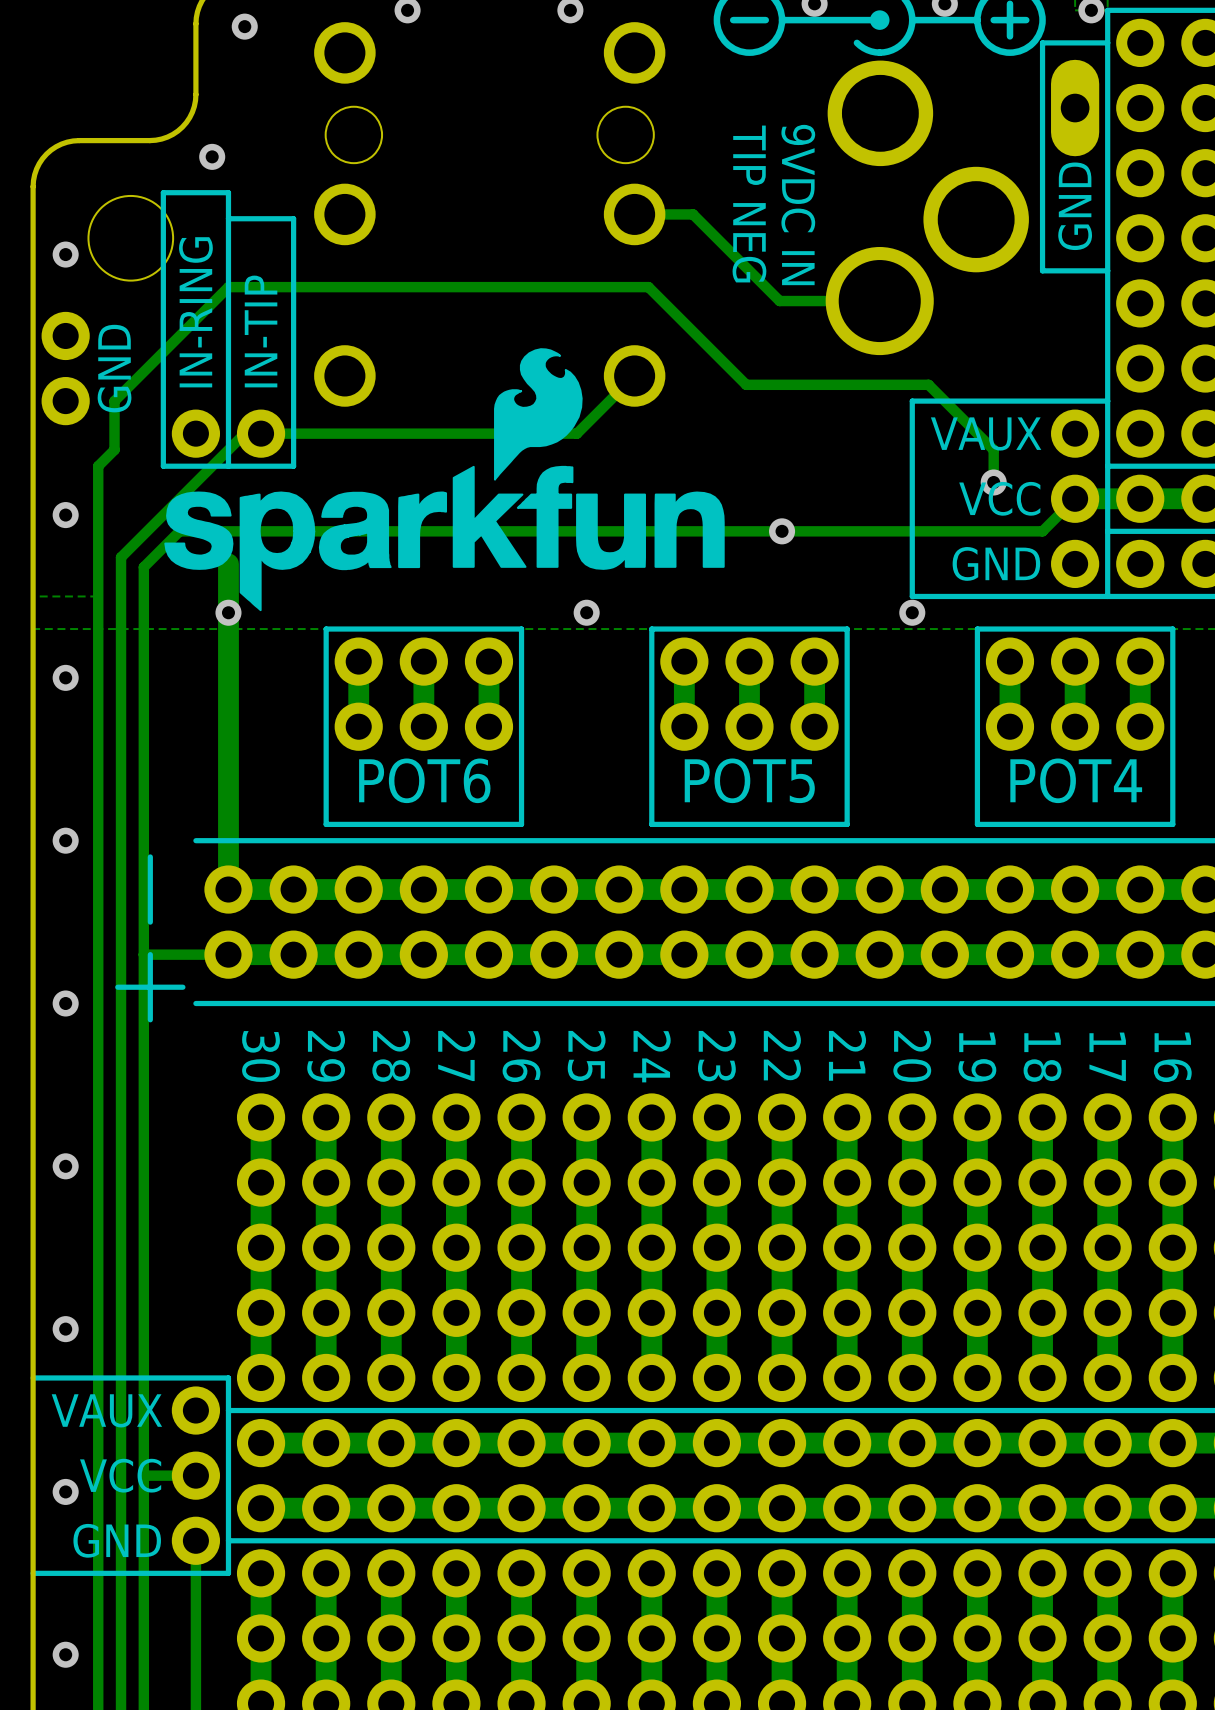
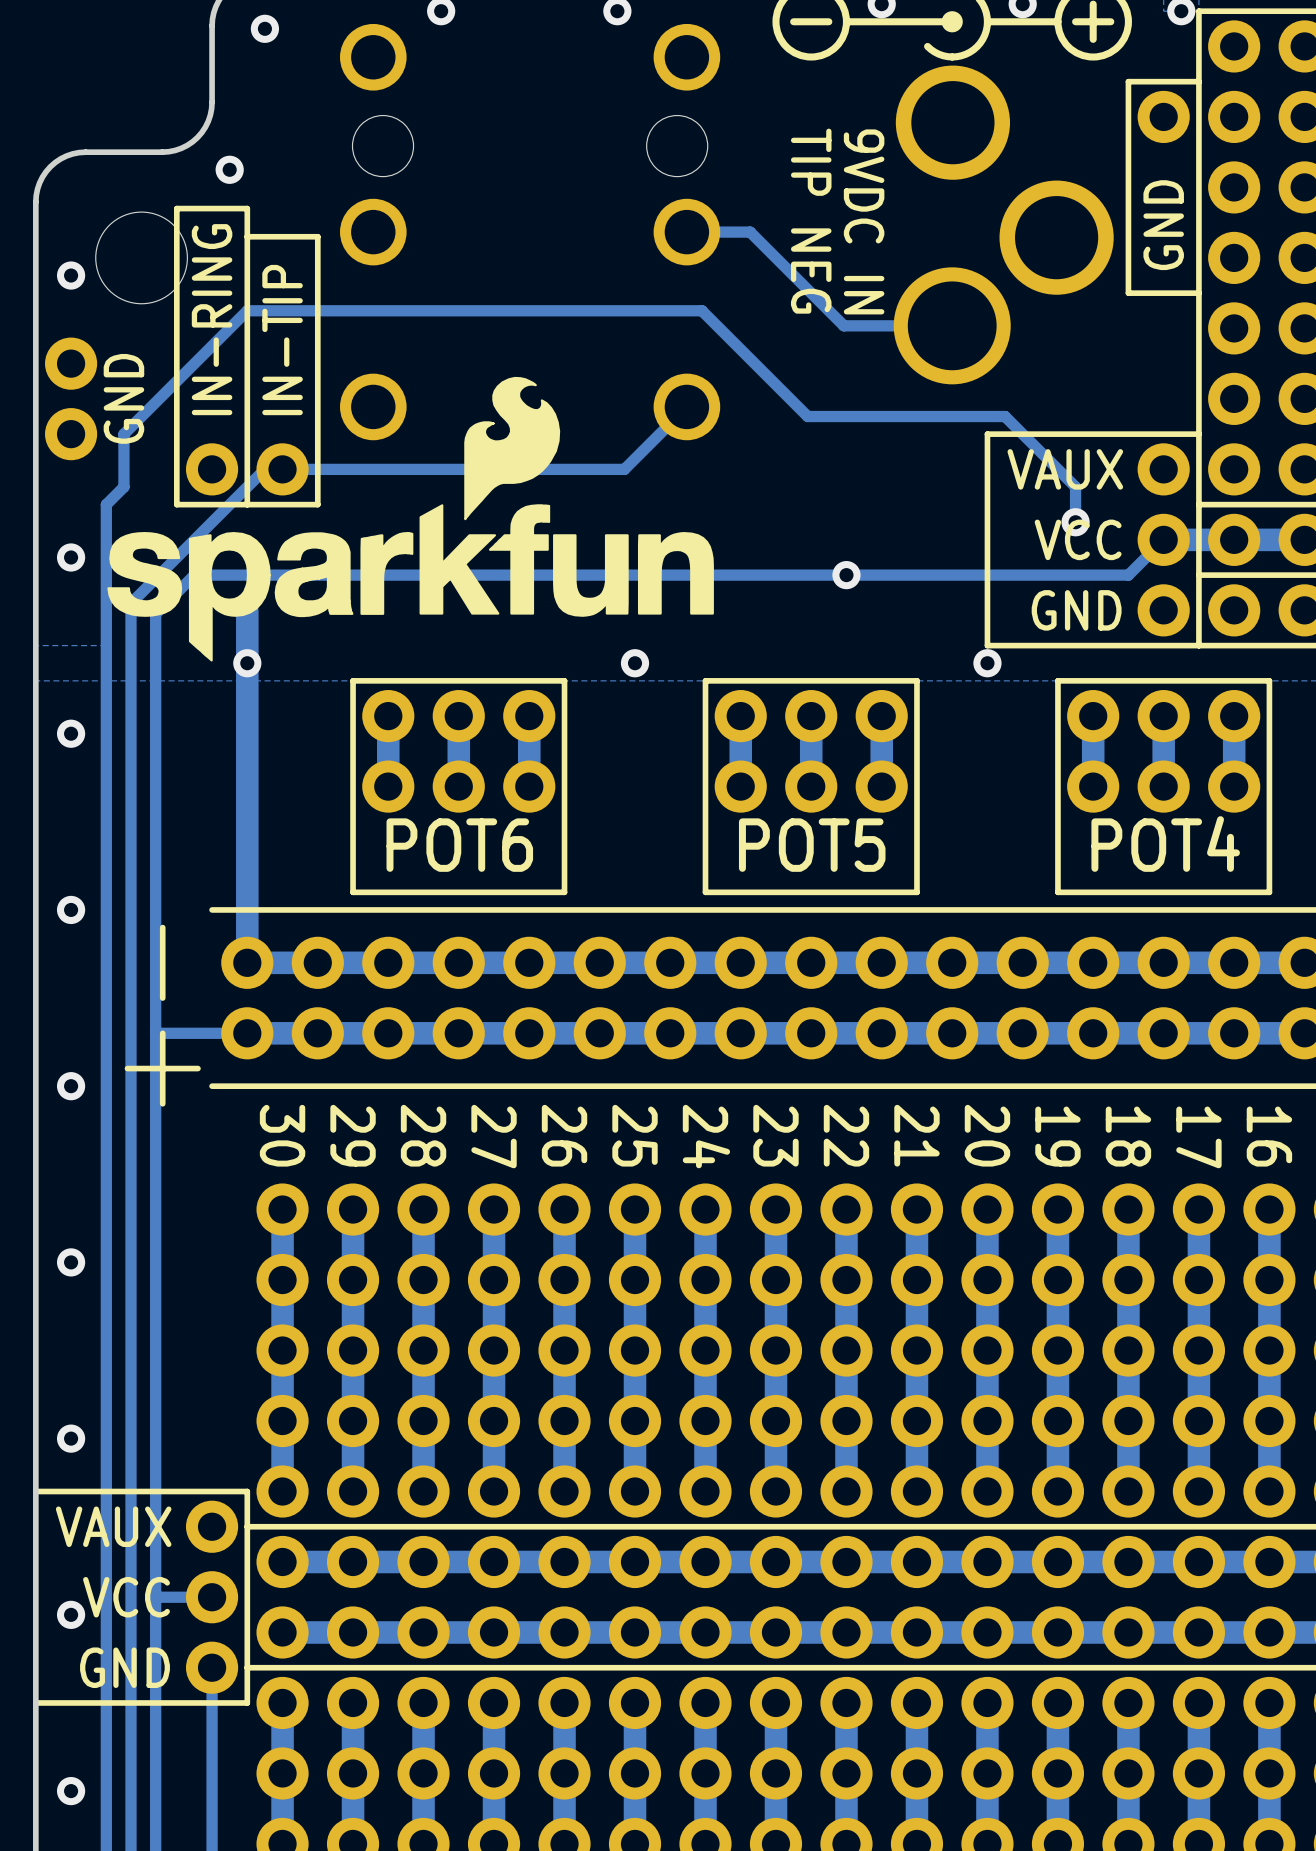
line: (1107, 42) (1042, 42) (1042, 75) -> (1198, 81) (1128, 81)
part footprint: [1051, 59, 1100, 157] -> [1137, 90, 1190, 144]
drawing position: (444, 479) -> (410, 519)

